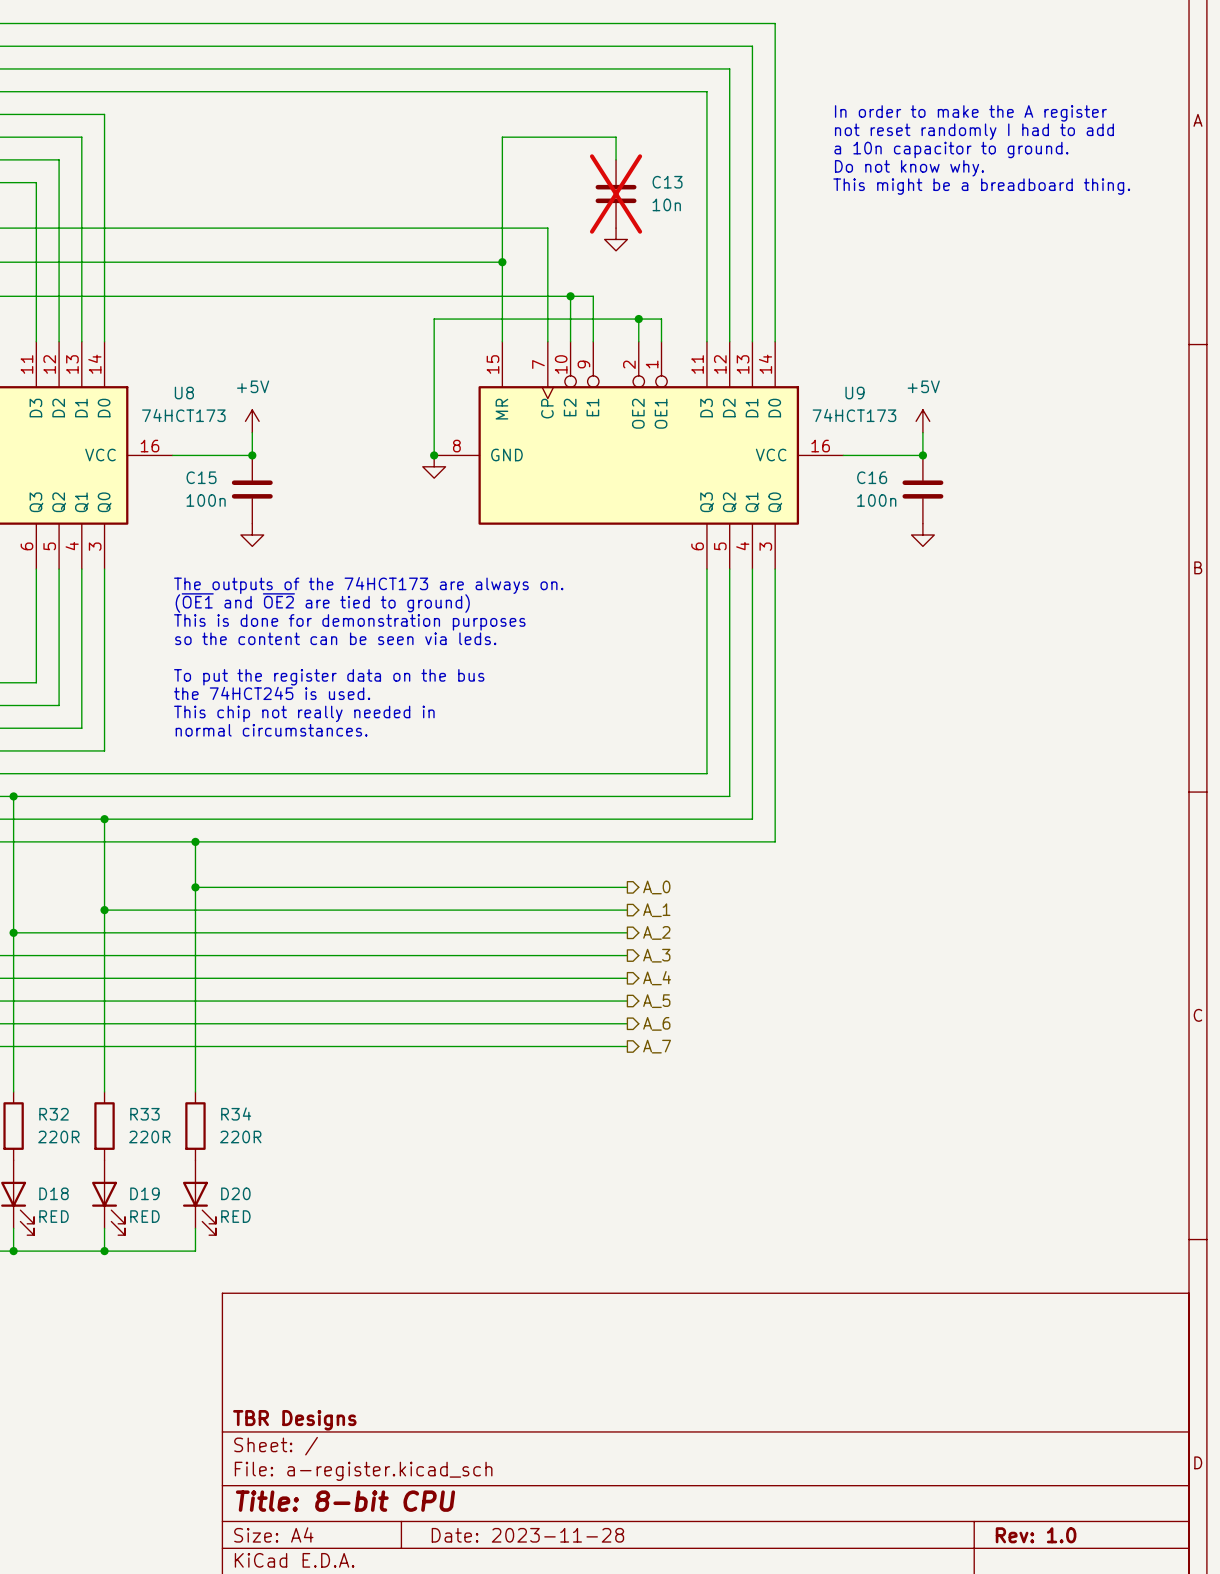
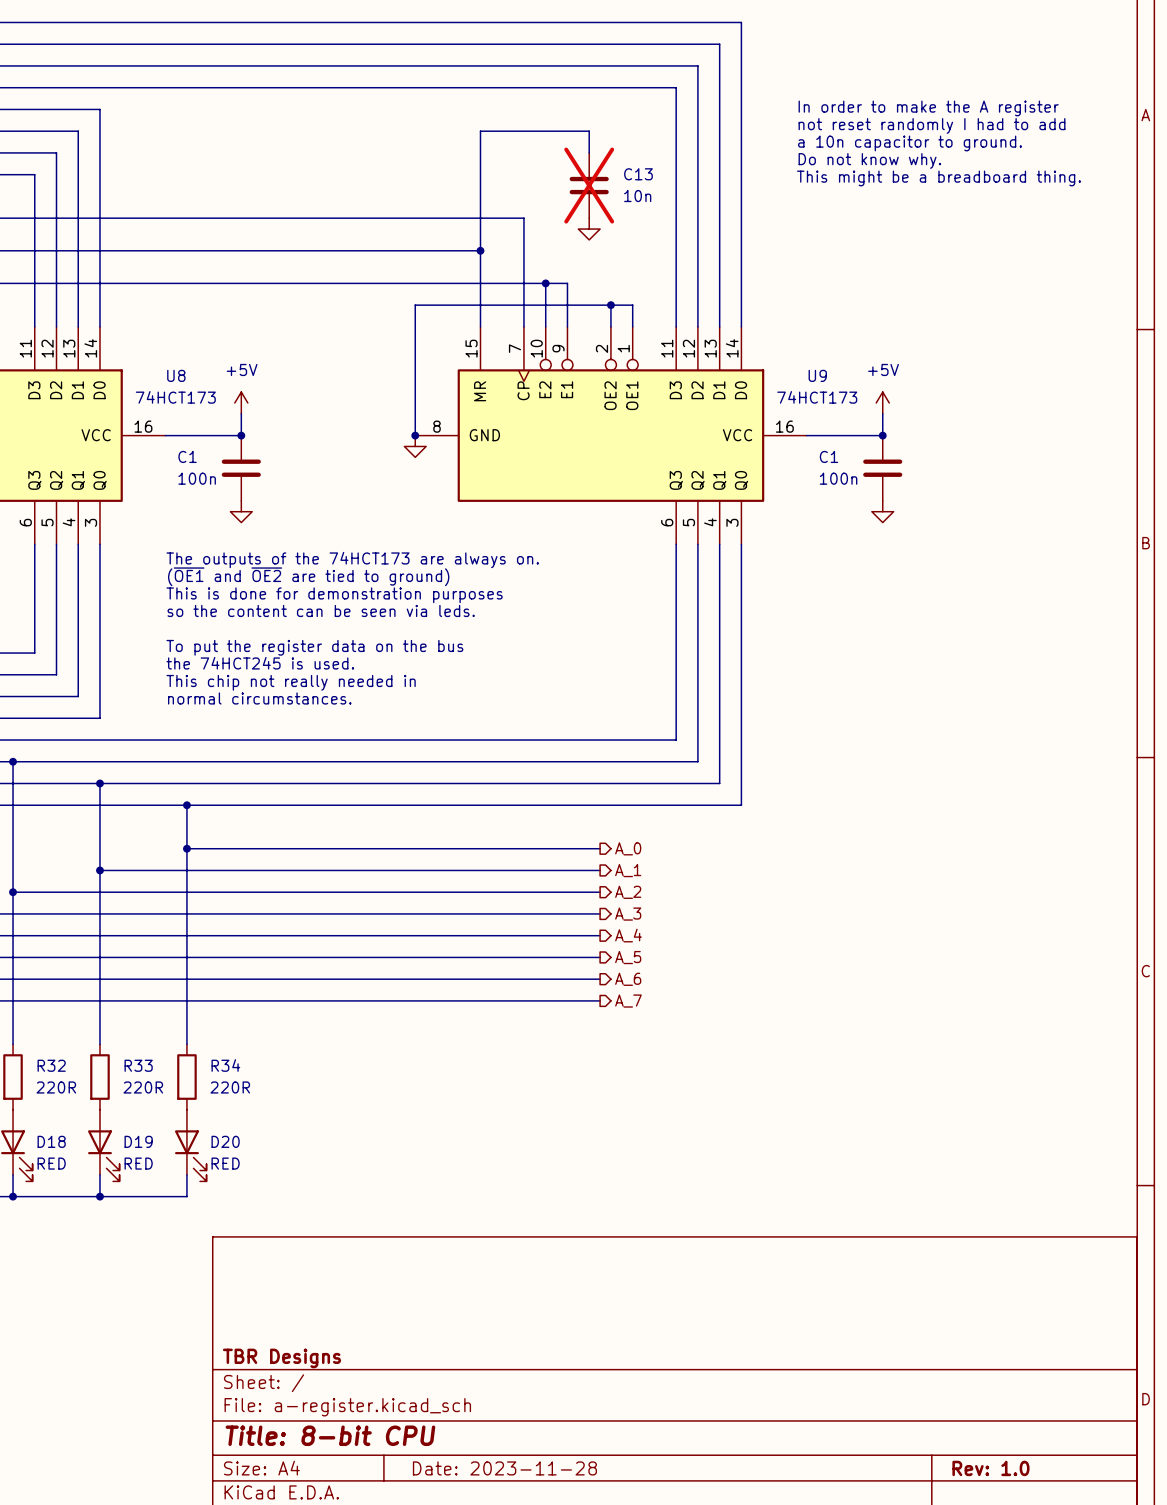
C15 name: C15 (201, 477) -> C1 (187, 456)
C16 name: C16 (872, 477) -> C1 (828, 456)

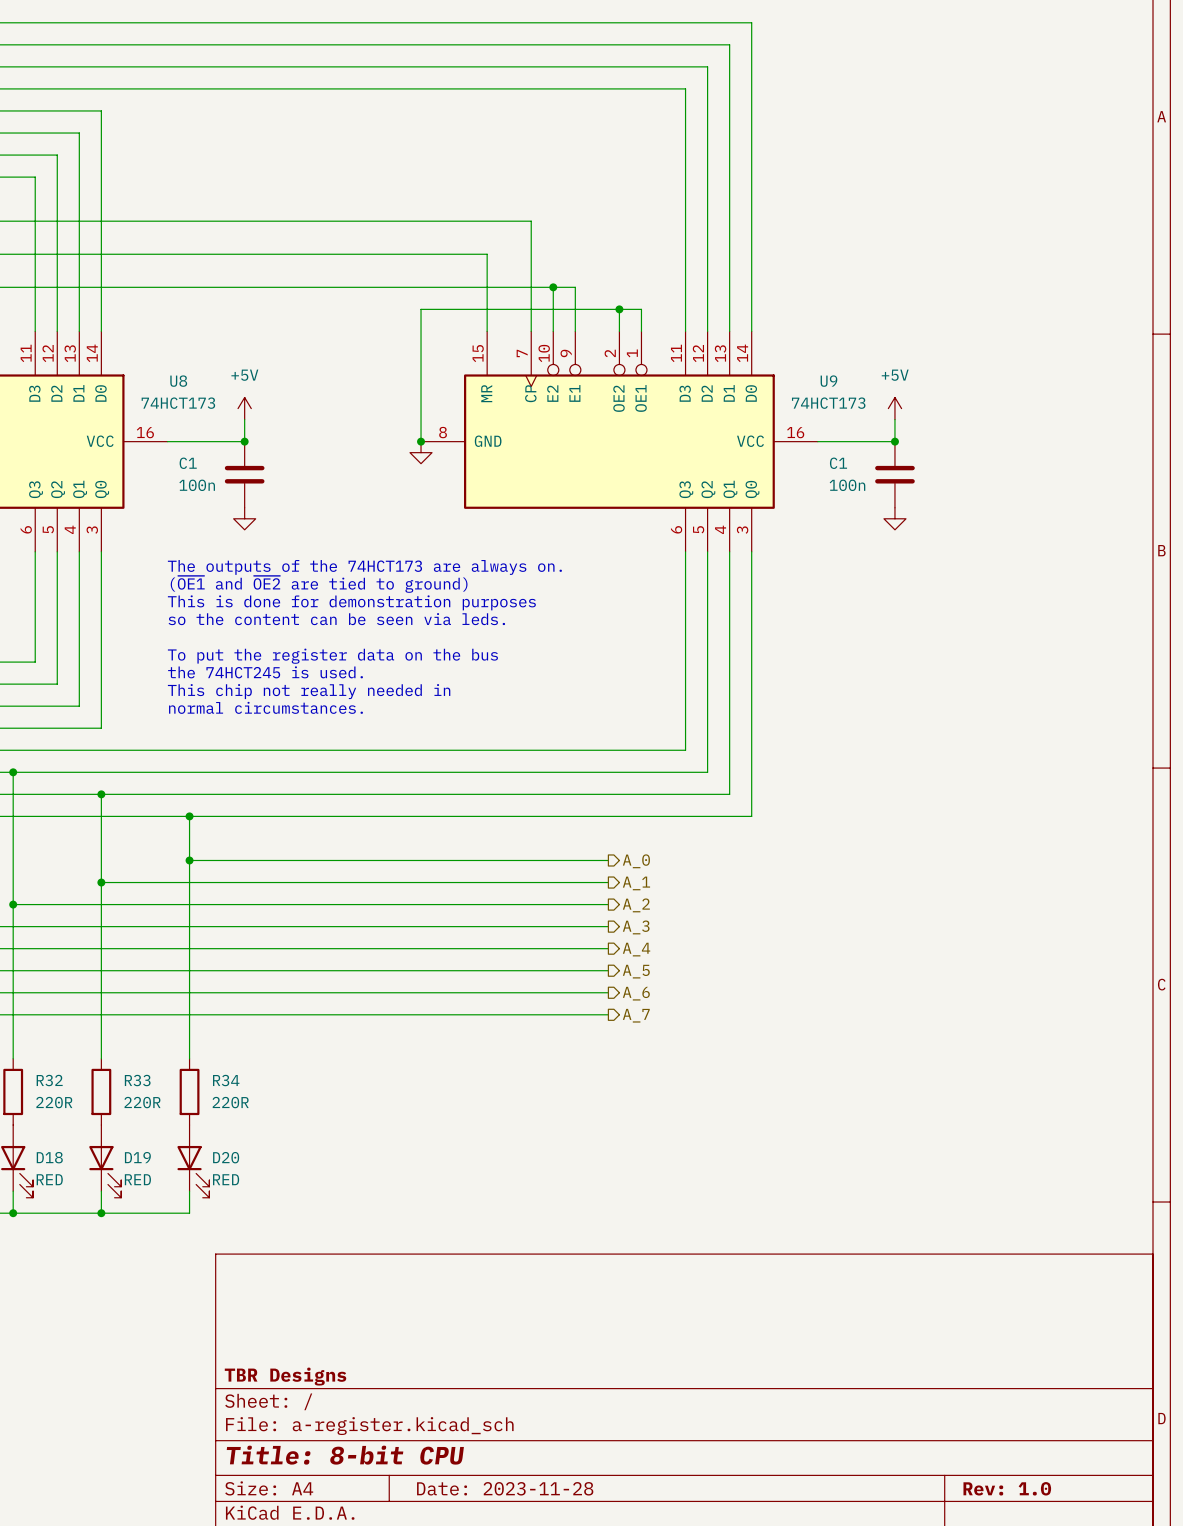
text: In order to make the A register (928, 108) -> none
text: not reset randomly I had to add (932, 125) -> none
text: a 10n capacitor to ground. (910, 143) -> none
wire: (589, 152) (589, 131) (480, 131) (480, 250) -> none
text: Do not know why. (869, 160) -> none
text: This might be a breadboard thing. (938, 178) -> none
C13: 10n (589, 185) -> none
power symbol: (589, 229) -> none
junction: (480, 250) -> none

